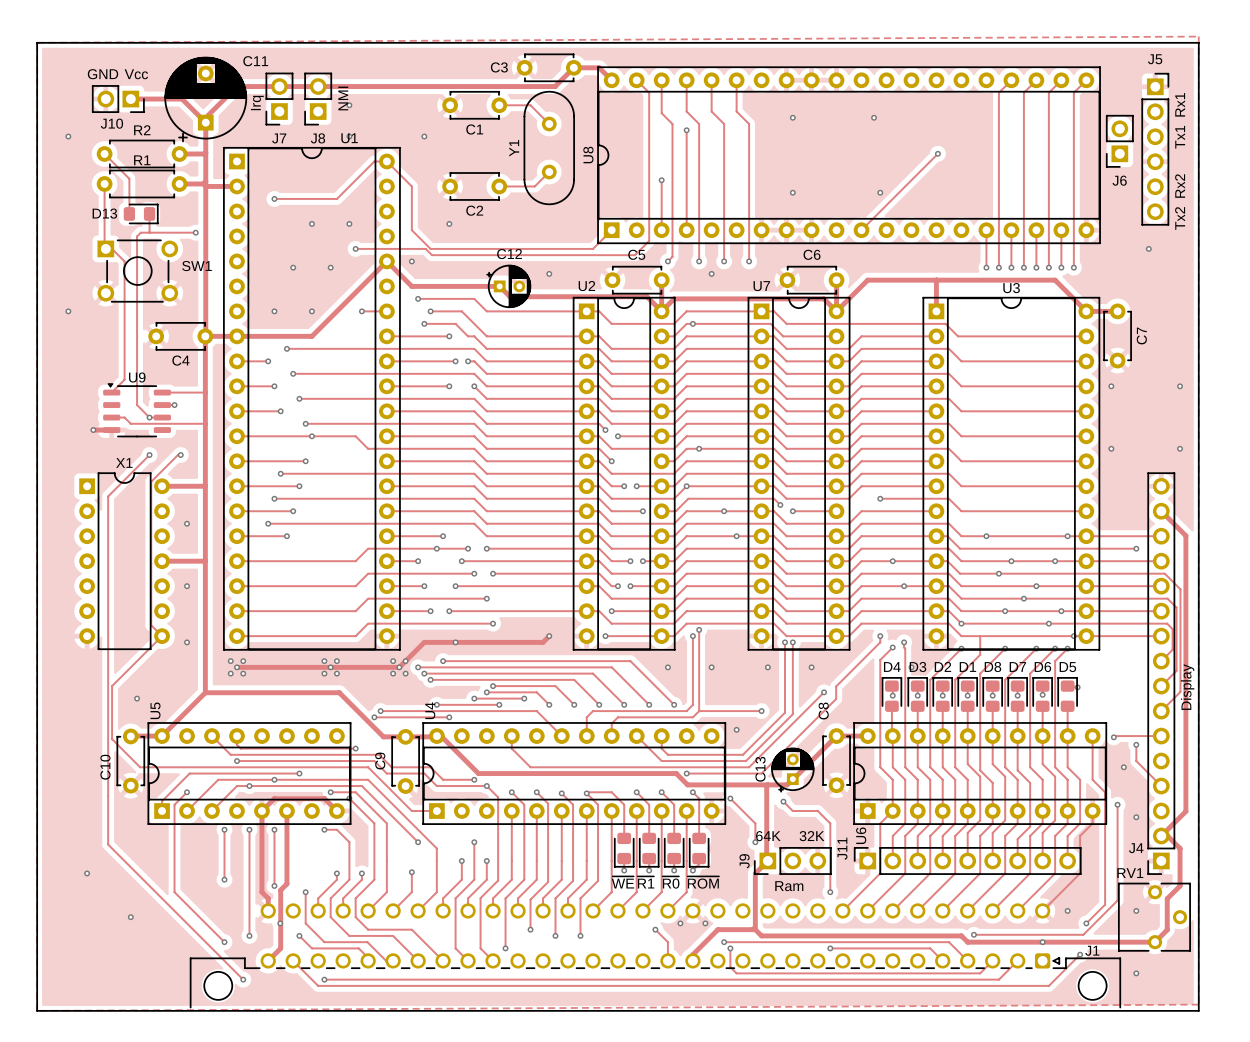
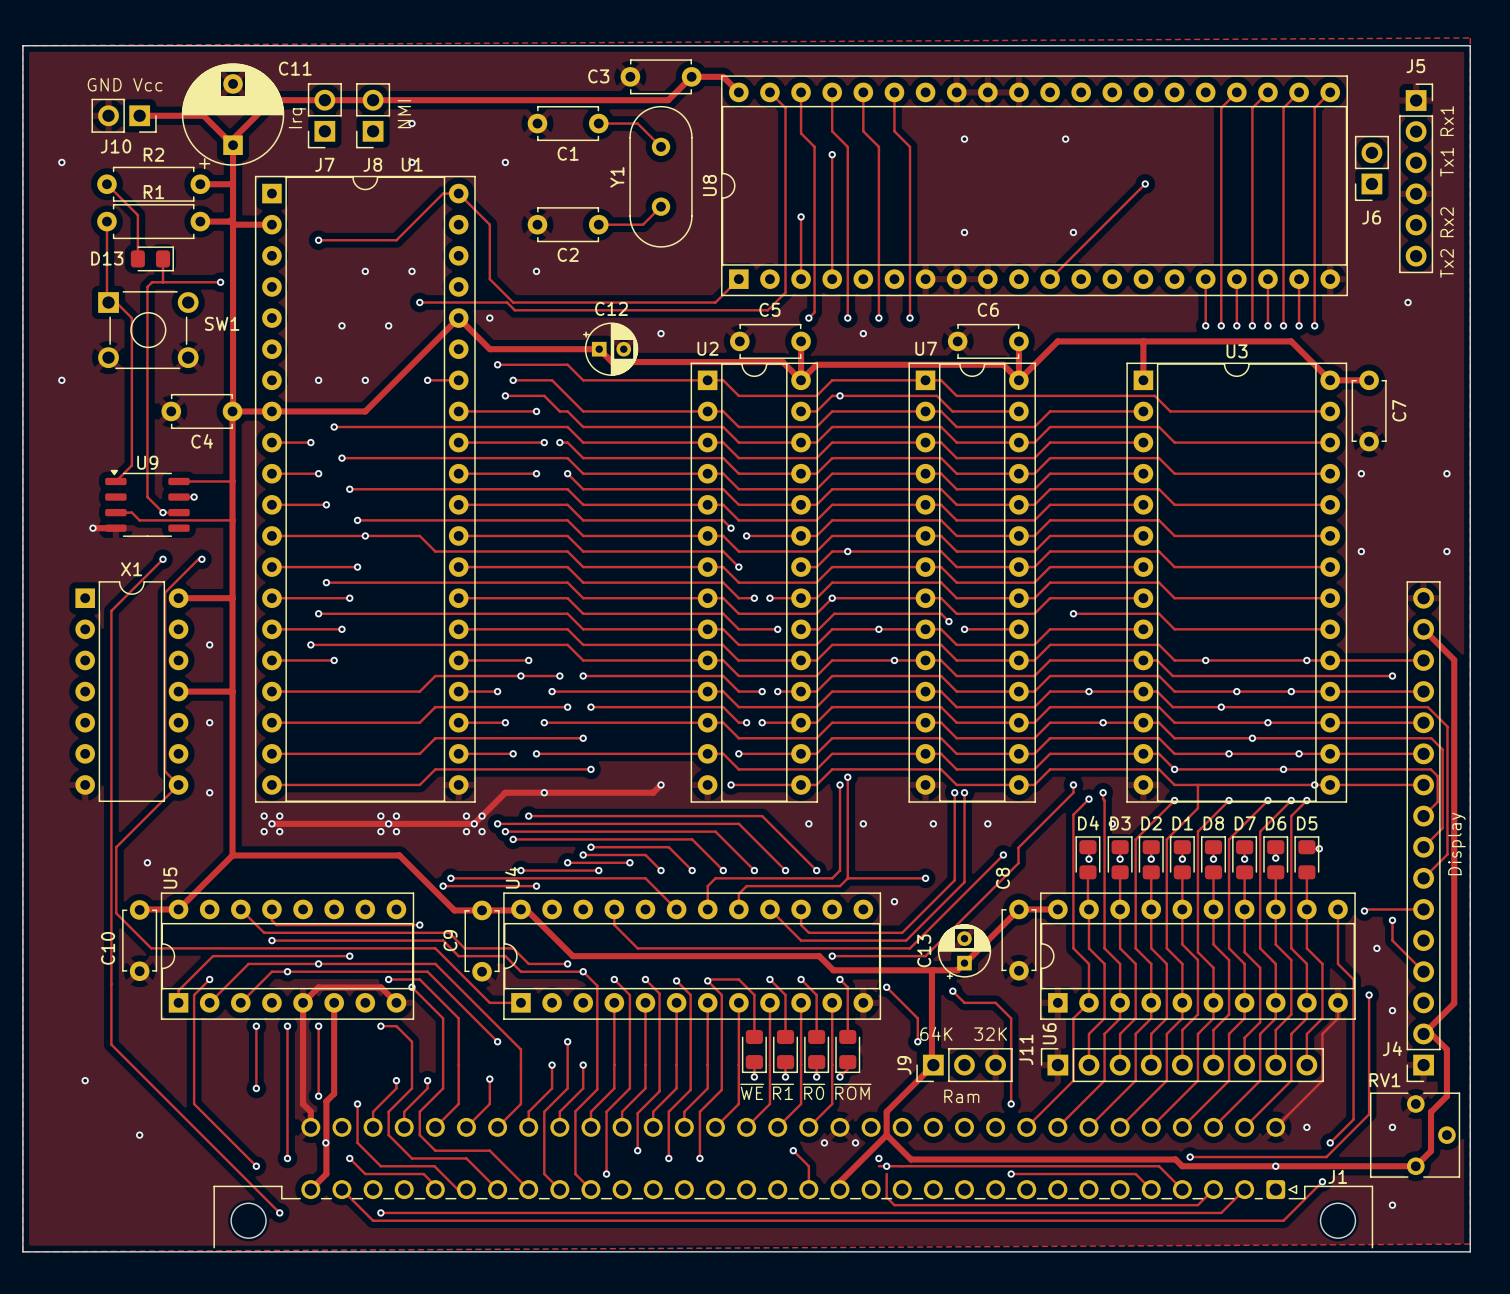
track: (755, 873) (755, 929) -> (917, 1080) (886, 1111) (886, 1135)
track: none -> (886, 1135) (871, 1150)
track: (717, 929) (754, 928) (761, 935) (962, 936) -> (886, 1135) (911, 1159) (1175, 1159)
via: none -> (878, 1158)
via: (724, 942) -> none
via: none -> (886, 1166)
via: (730, 948) -> none

